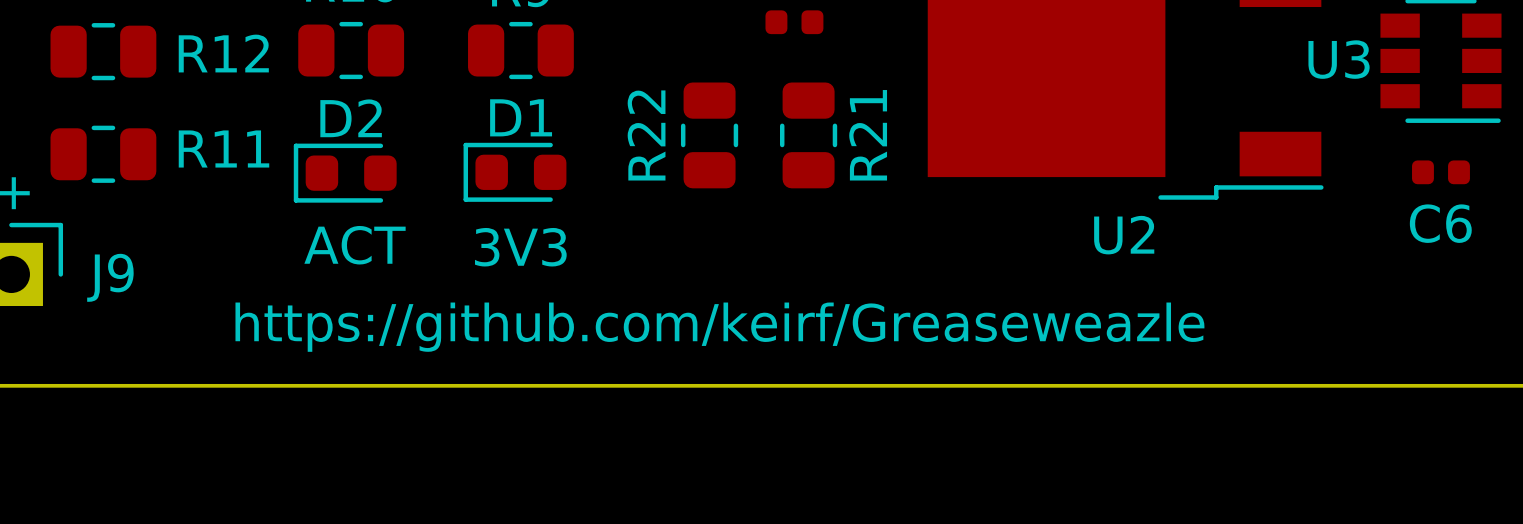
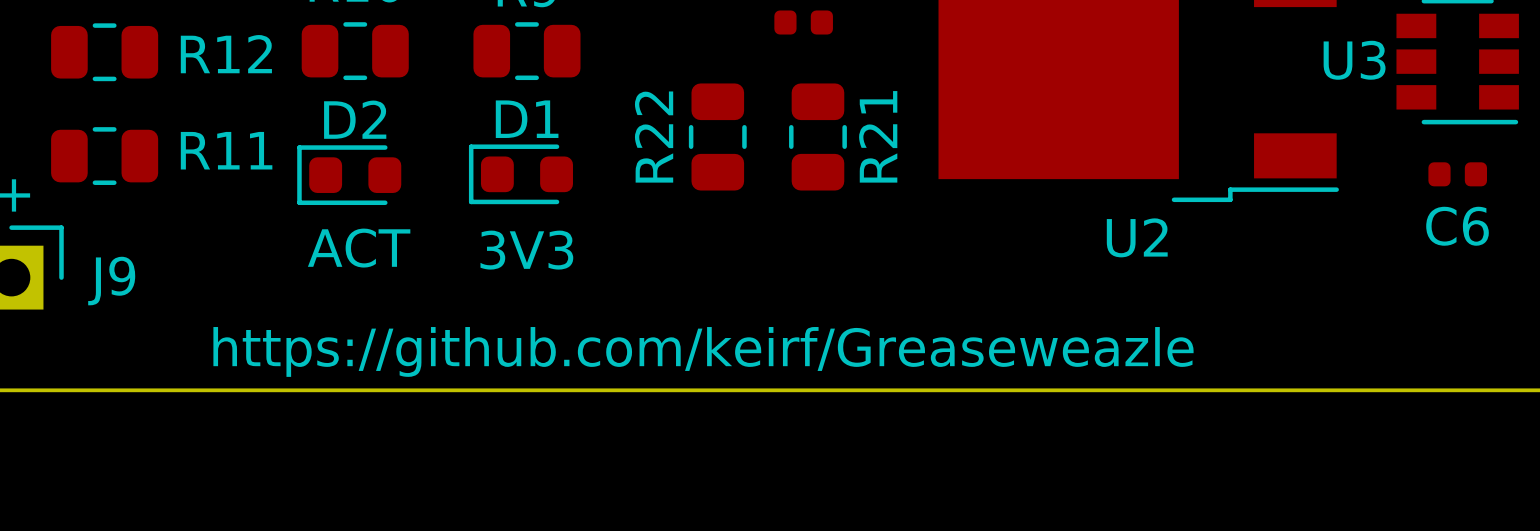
text position: https://github.com/keirf/Greaseweazle (719, 327) -> https://github.com/keirf/Greaseweazle (703, 351)

